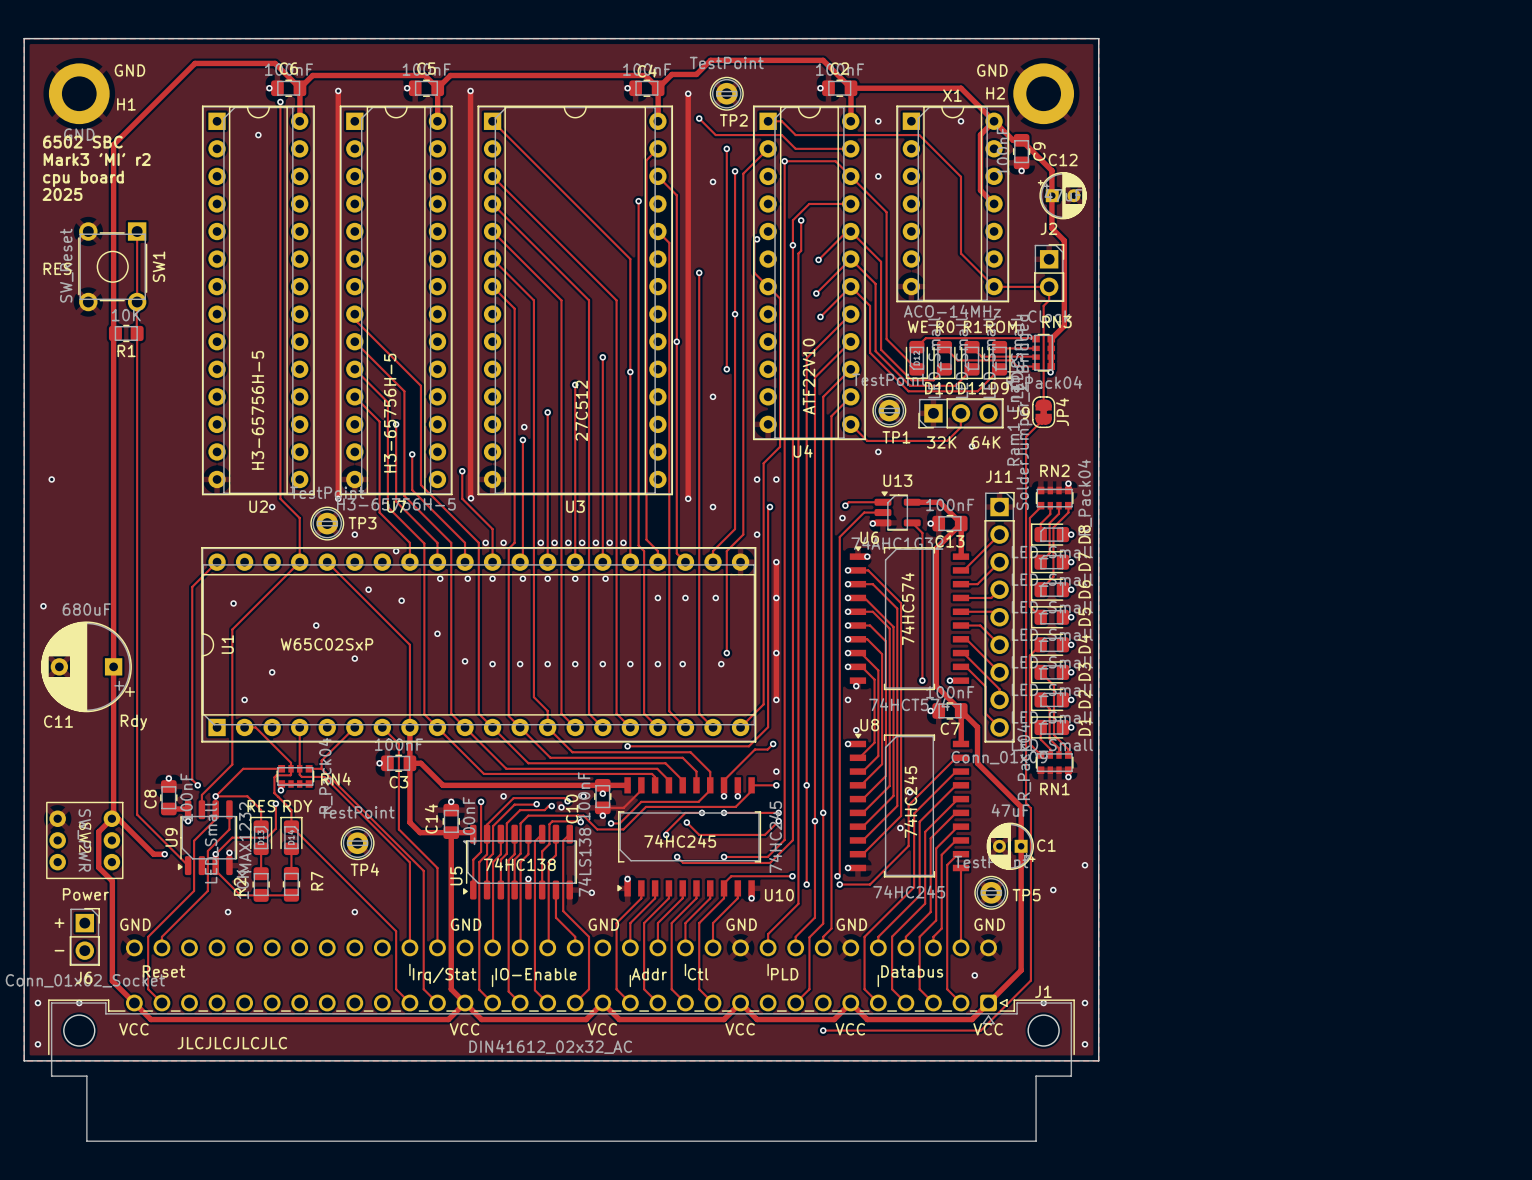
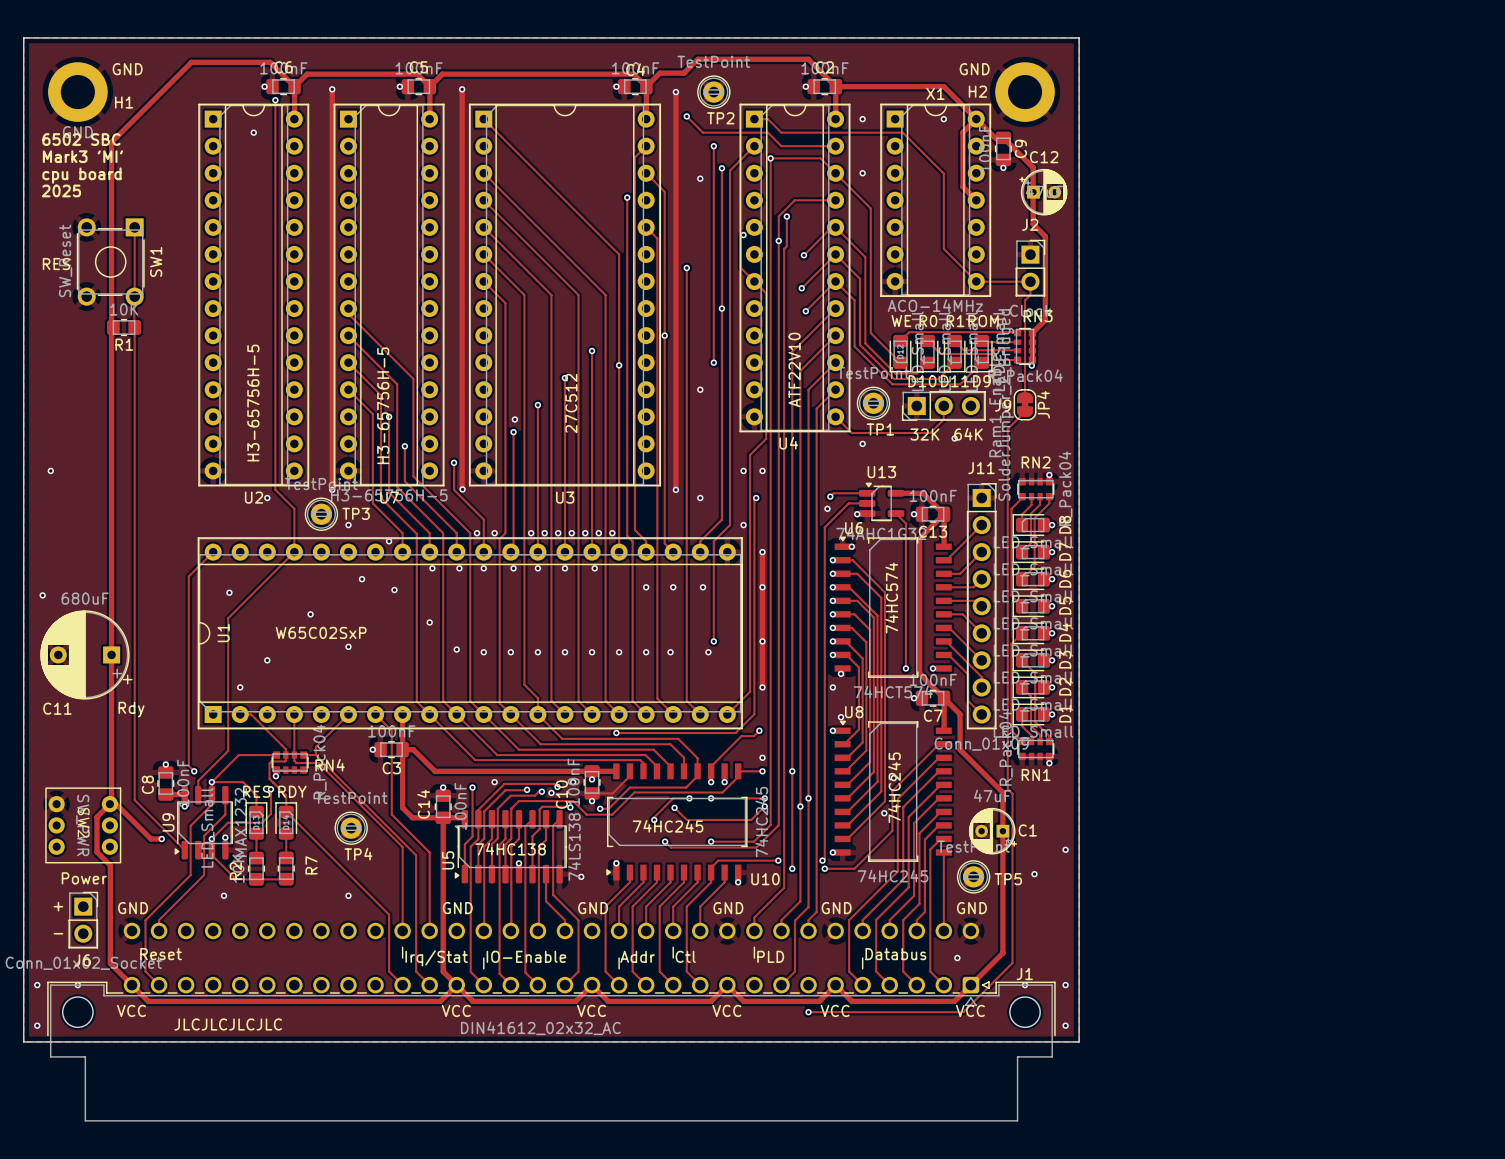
text: Mark3 'MI' r2 (97, 159) -> Mark3 'MI' (82, 156)
track: (327, 562) (409, 644) (409, 727) -> none

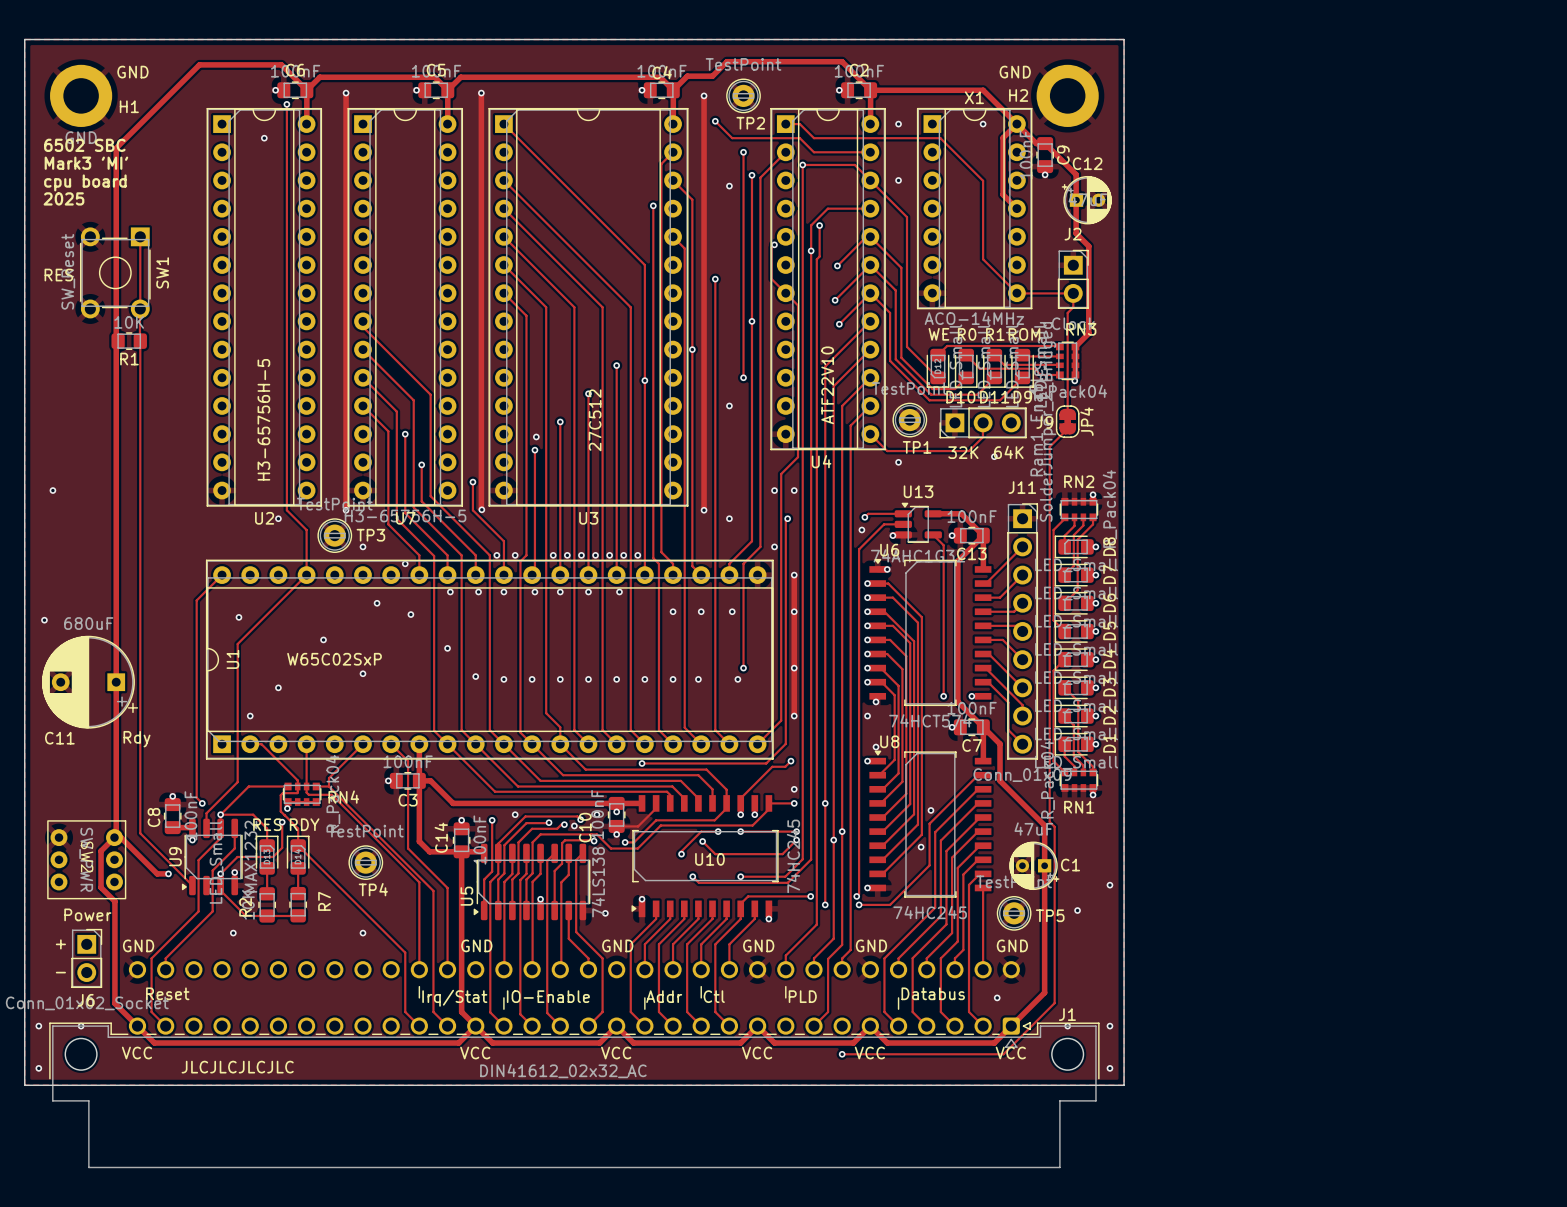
text: H3-65756H-5 (383, 405) -> none
text: 74HC574 (891, 598) -> none
text: 74HC245 (894, 787) -> none
text: 74HC245 (668, 826) -> none
text: 74HC138 (510, 849) -> none
U10 name position: U10 (765, 879) -> U10 (709, 859)

